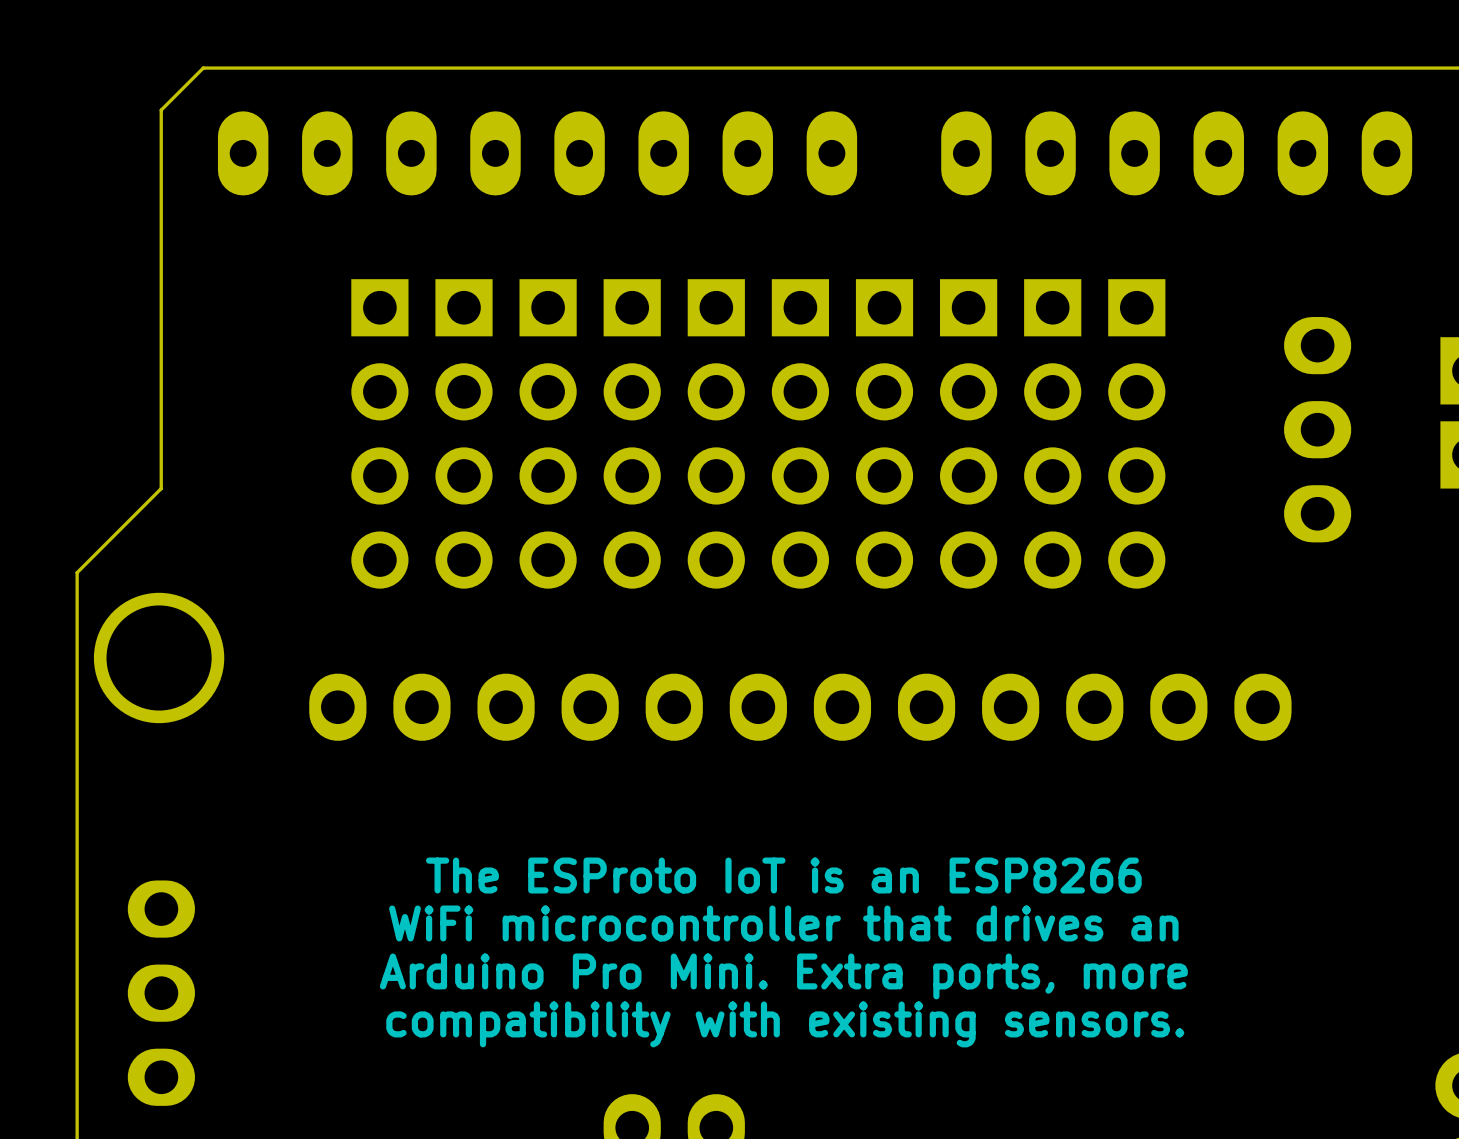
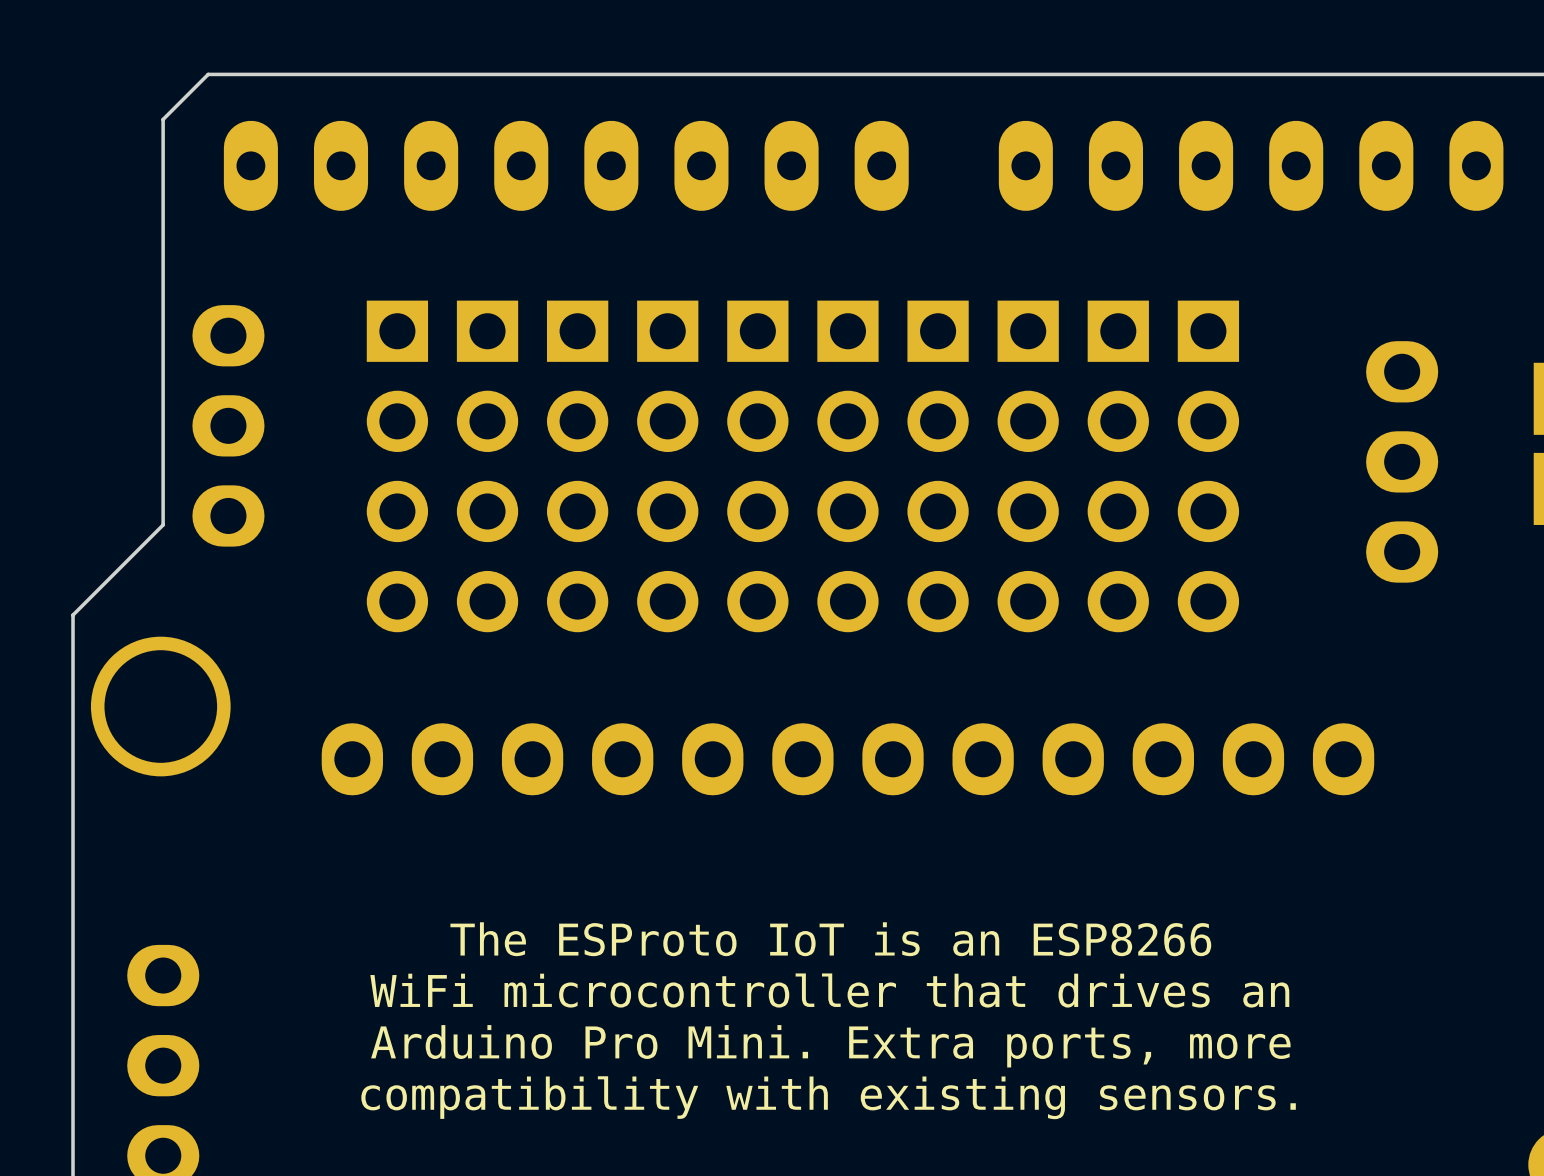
part: none -> (228, 425)

